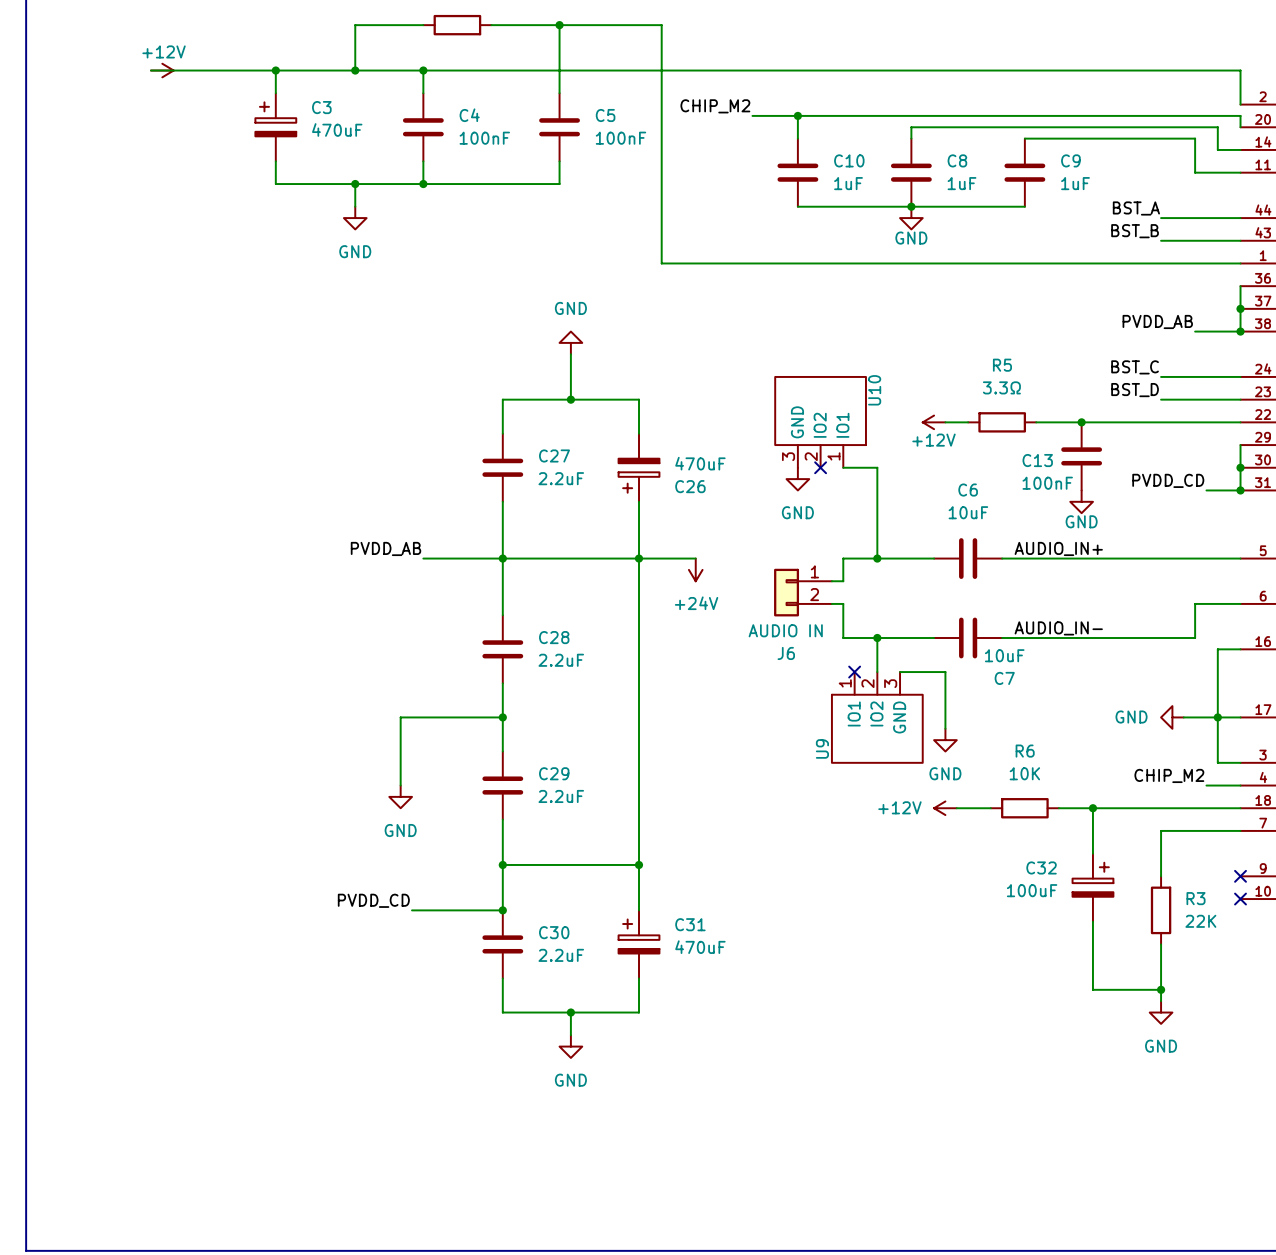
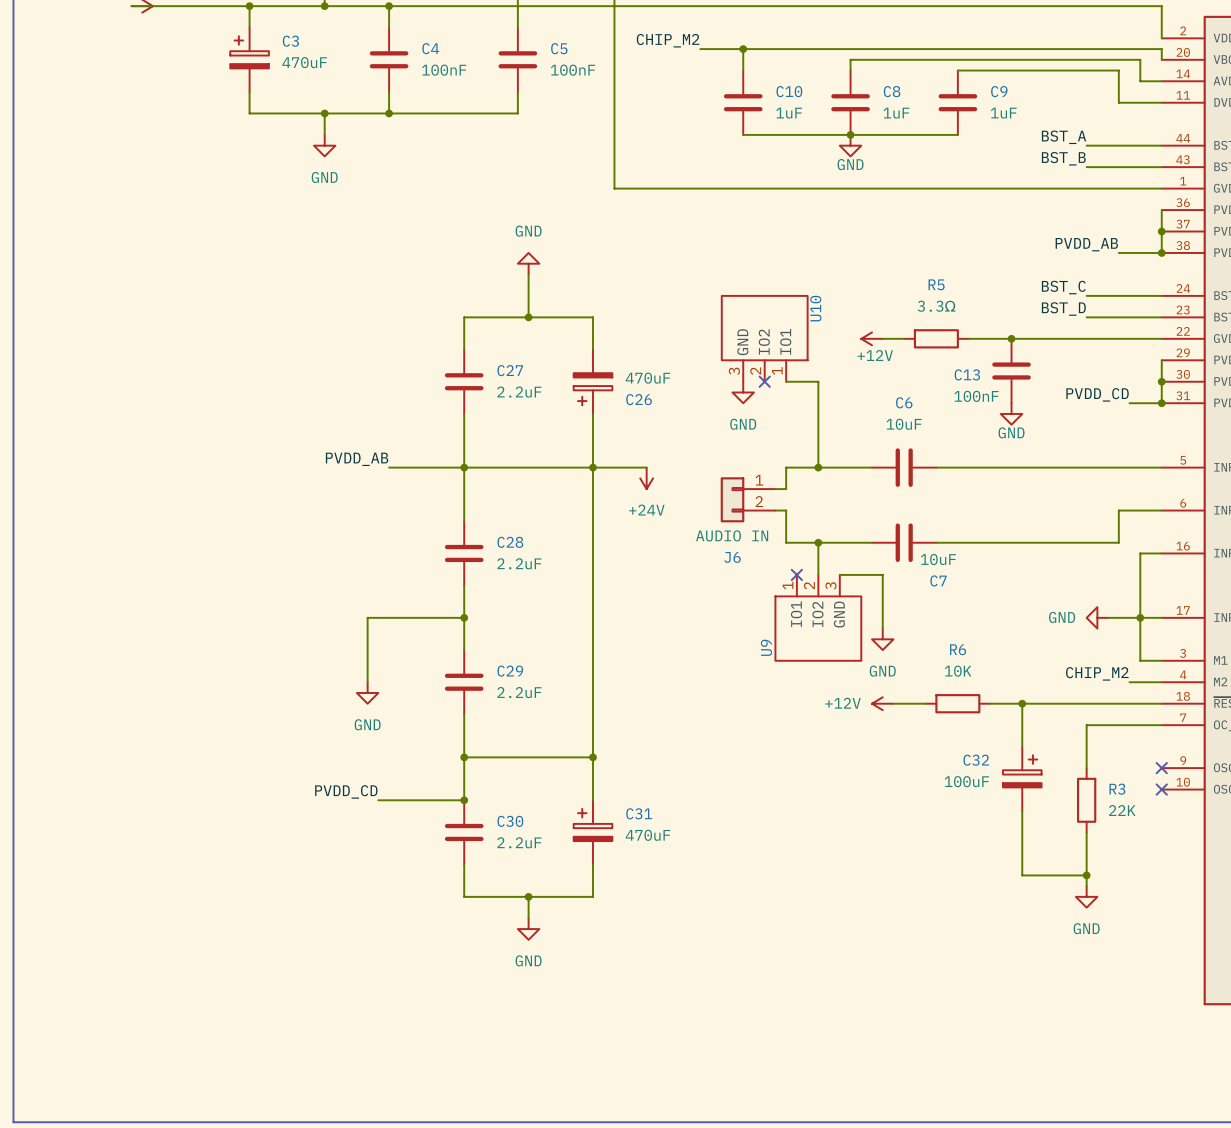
label: AUDIO_IN+ (1058, 548) -> none
label: AUDIO_IN- (1058, 628) -> none

